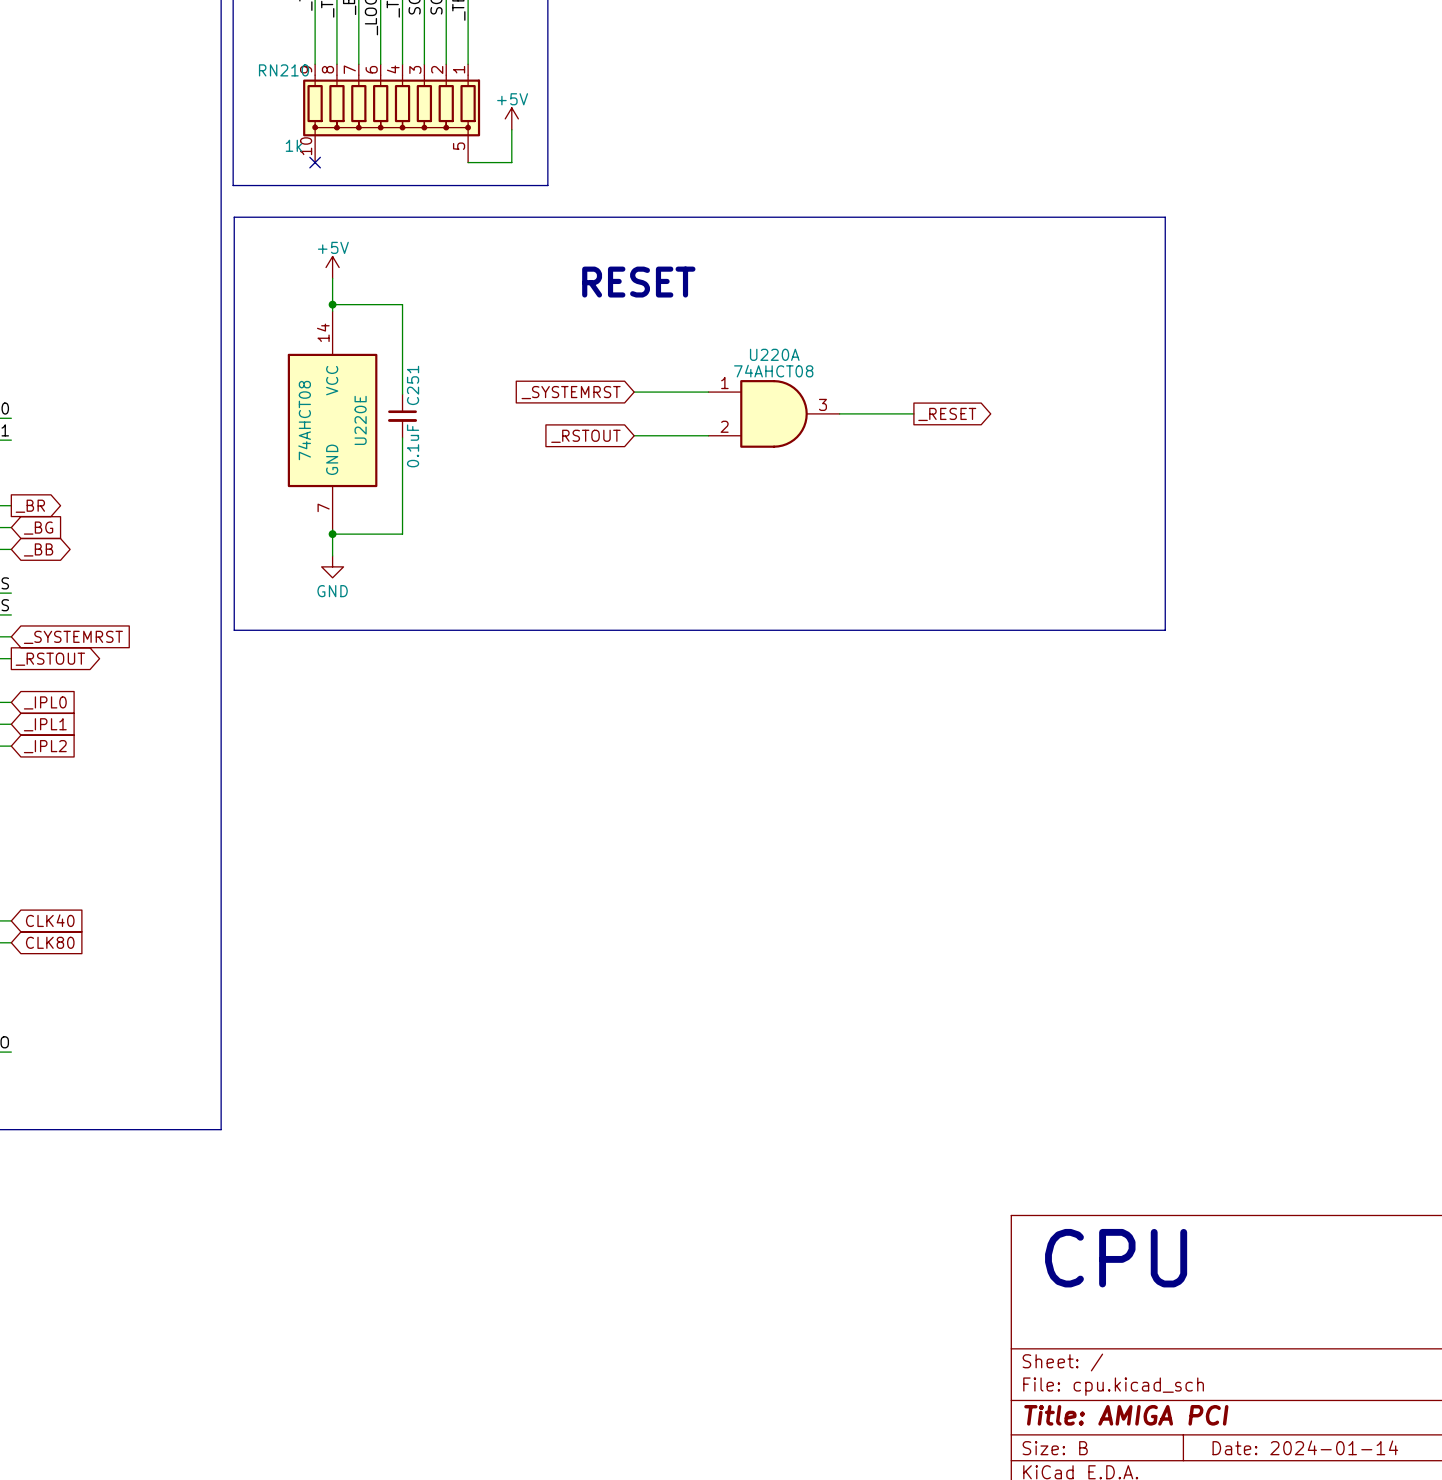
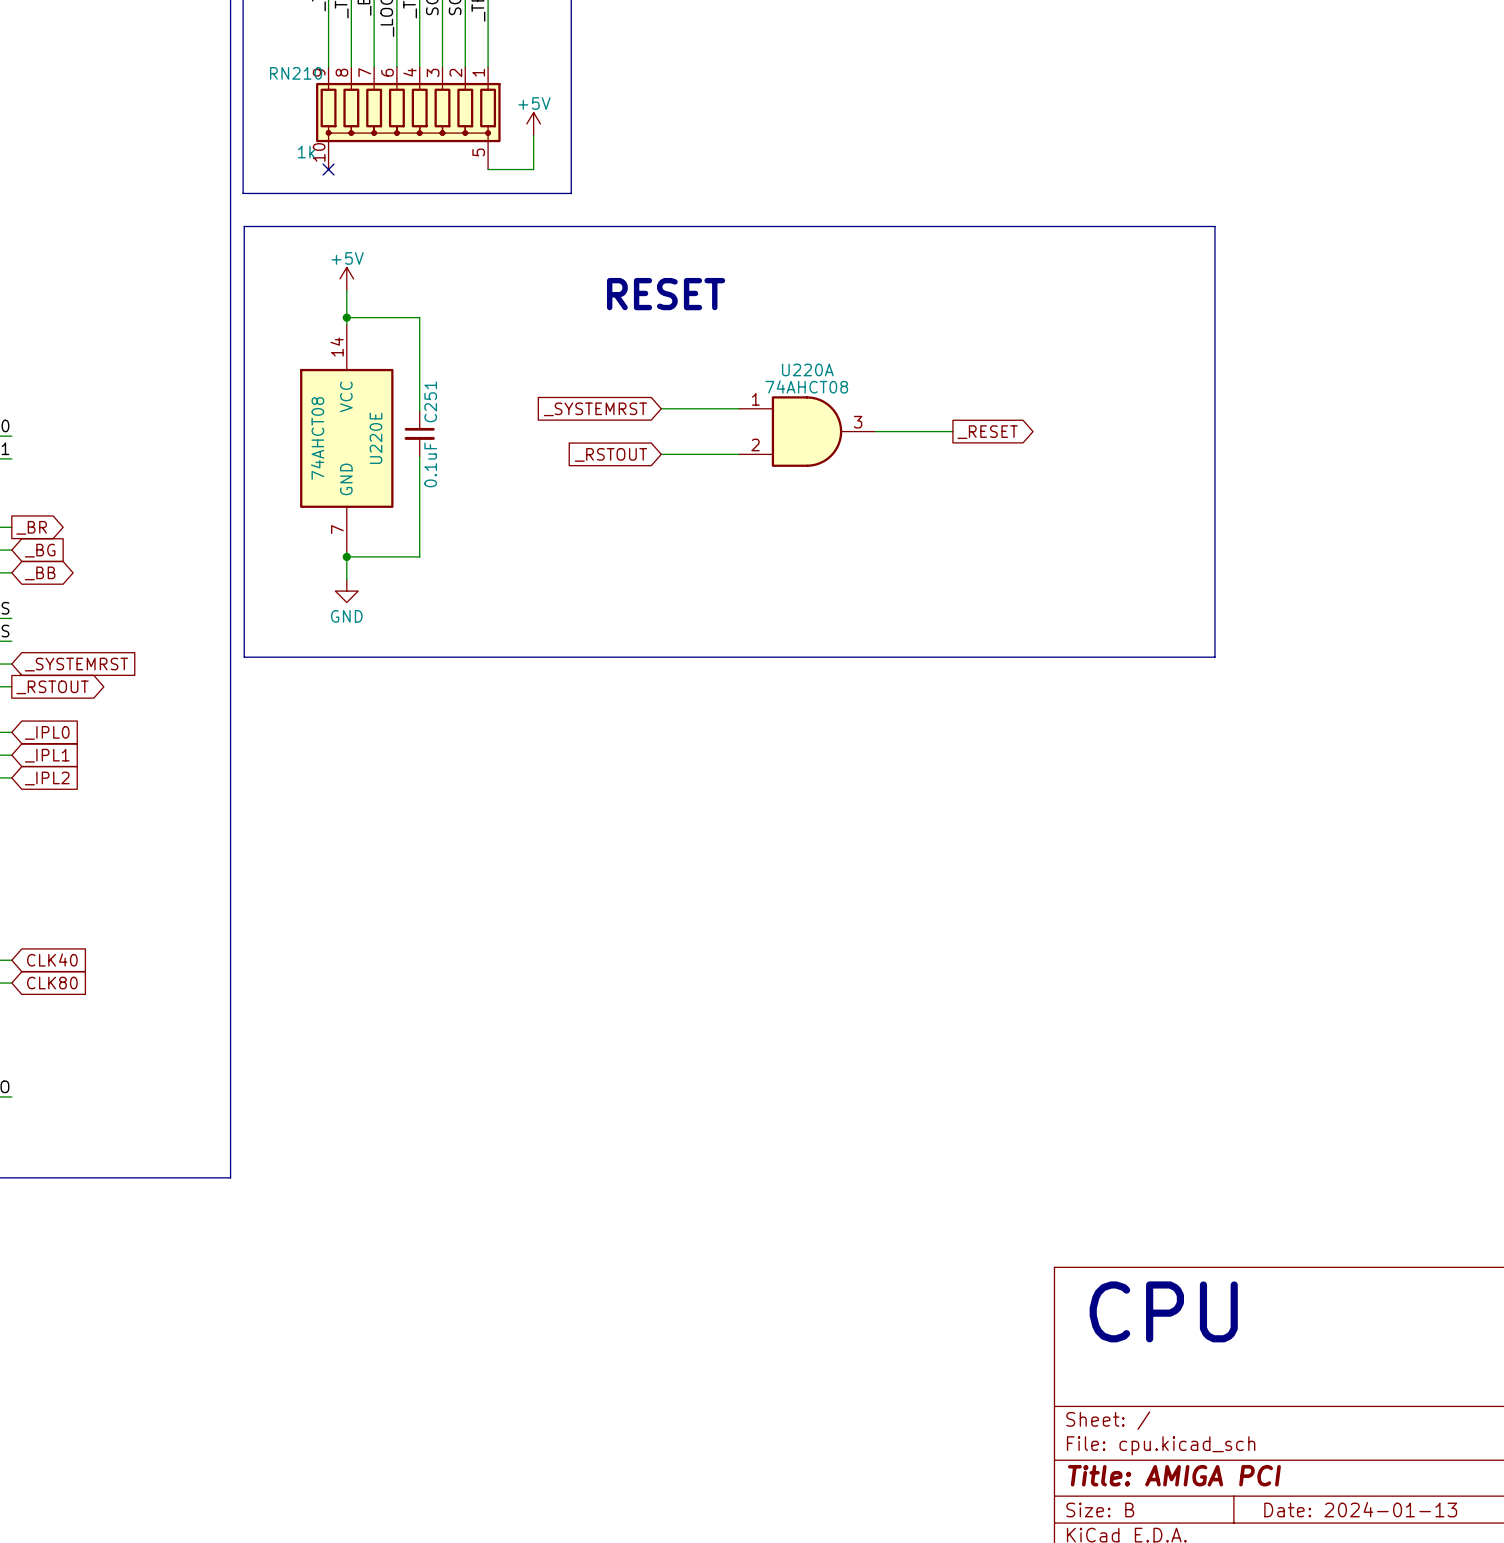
title block: Date: 2024-01-14 (1305, 1447) -> Date: 2024-01-13 (1360, 1509)

